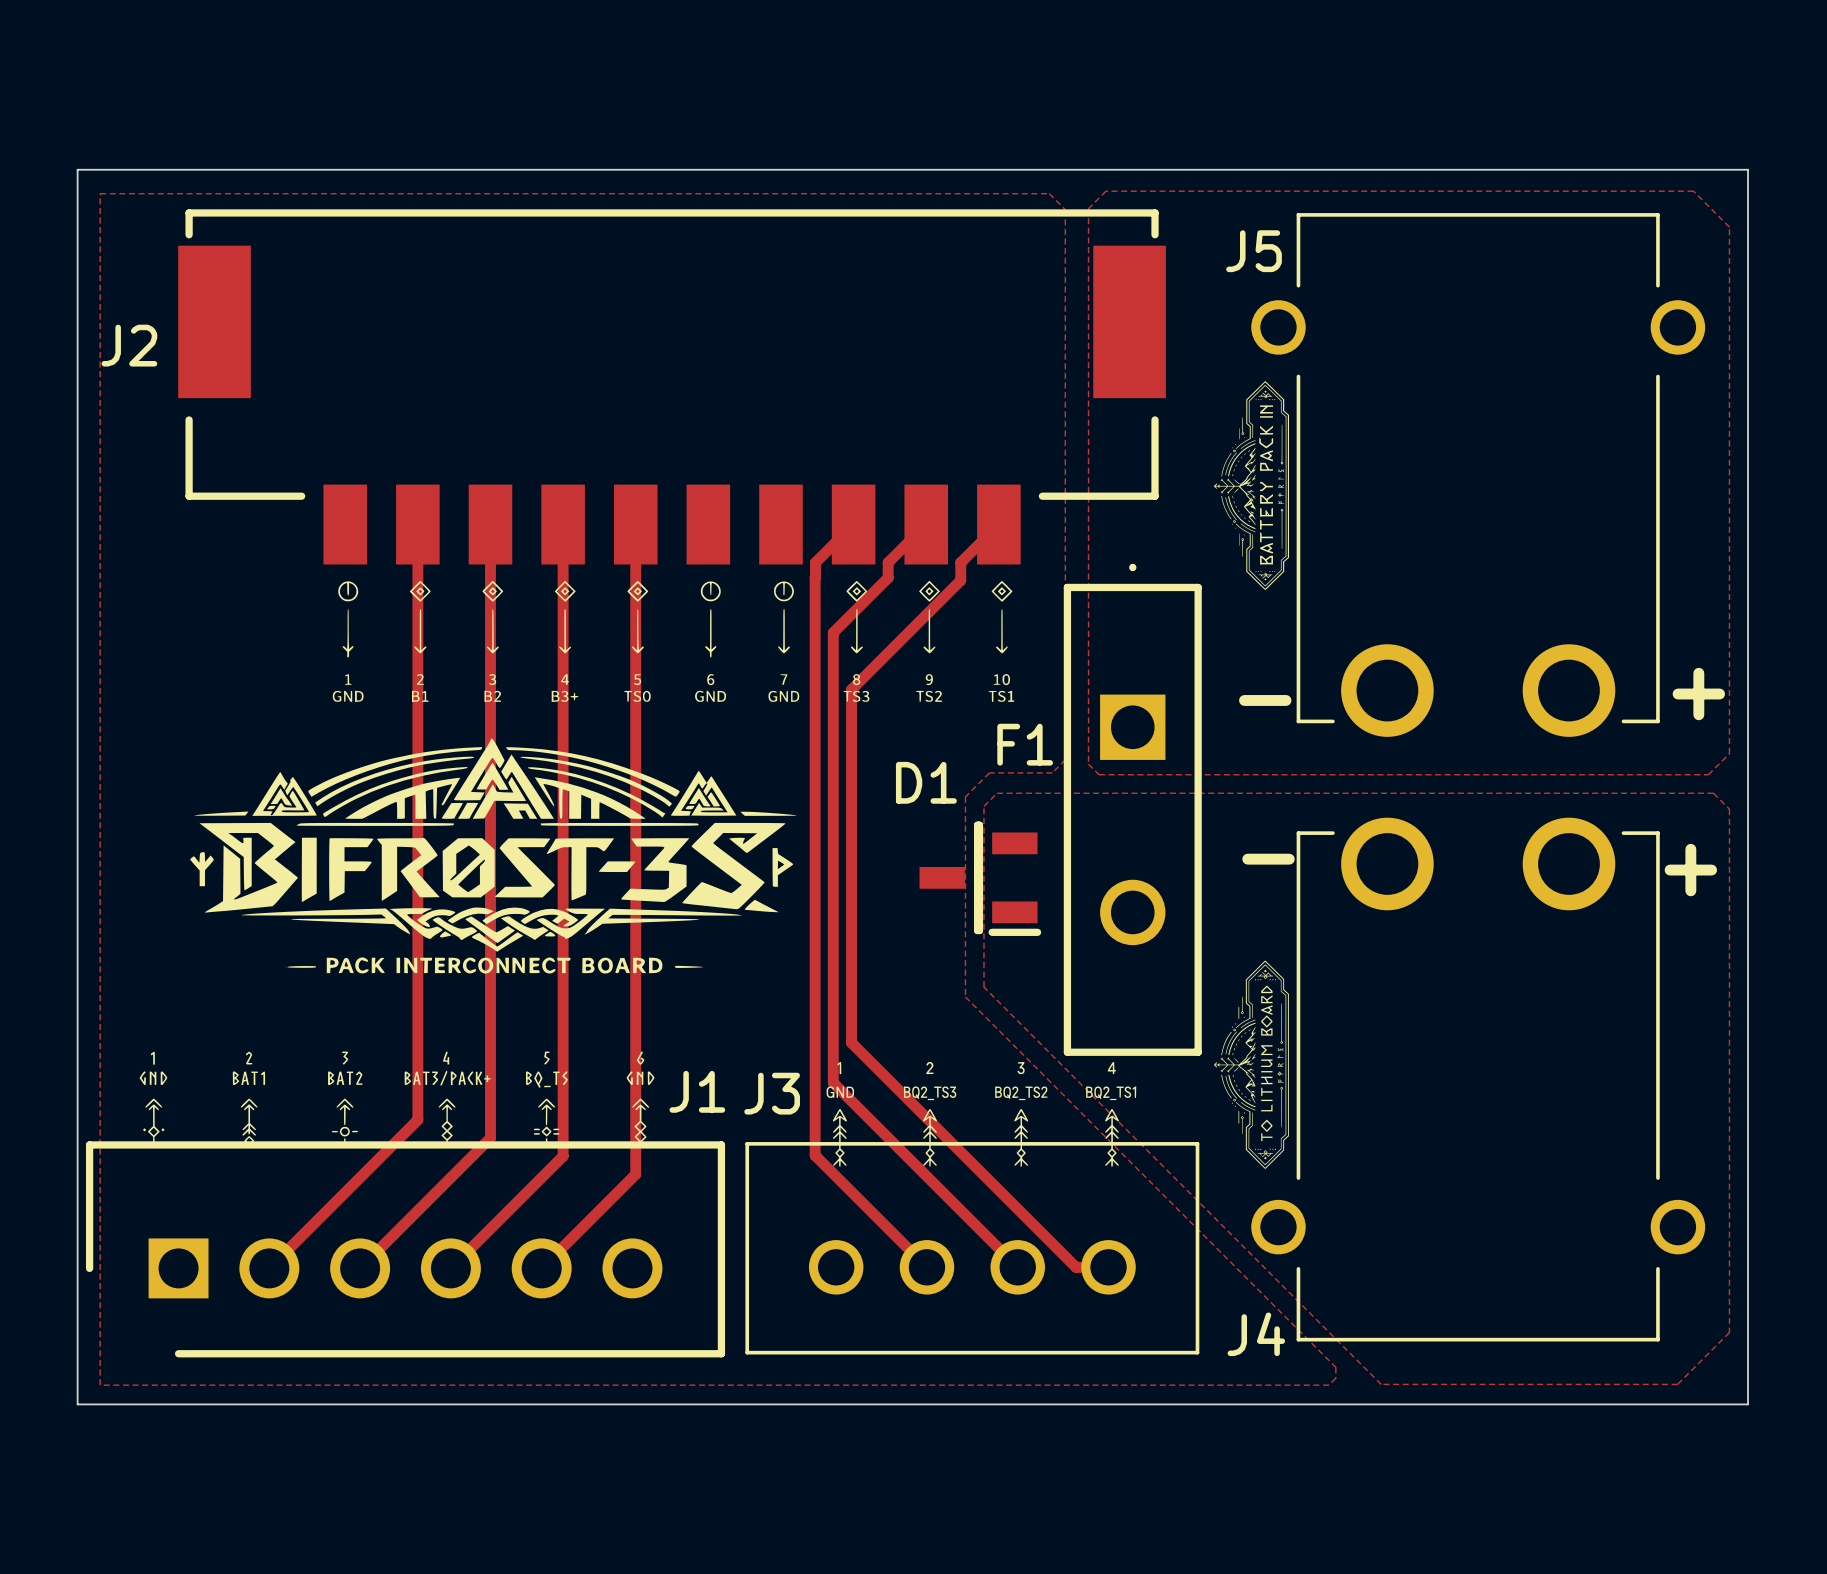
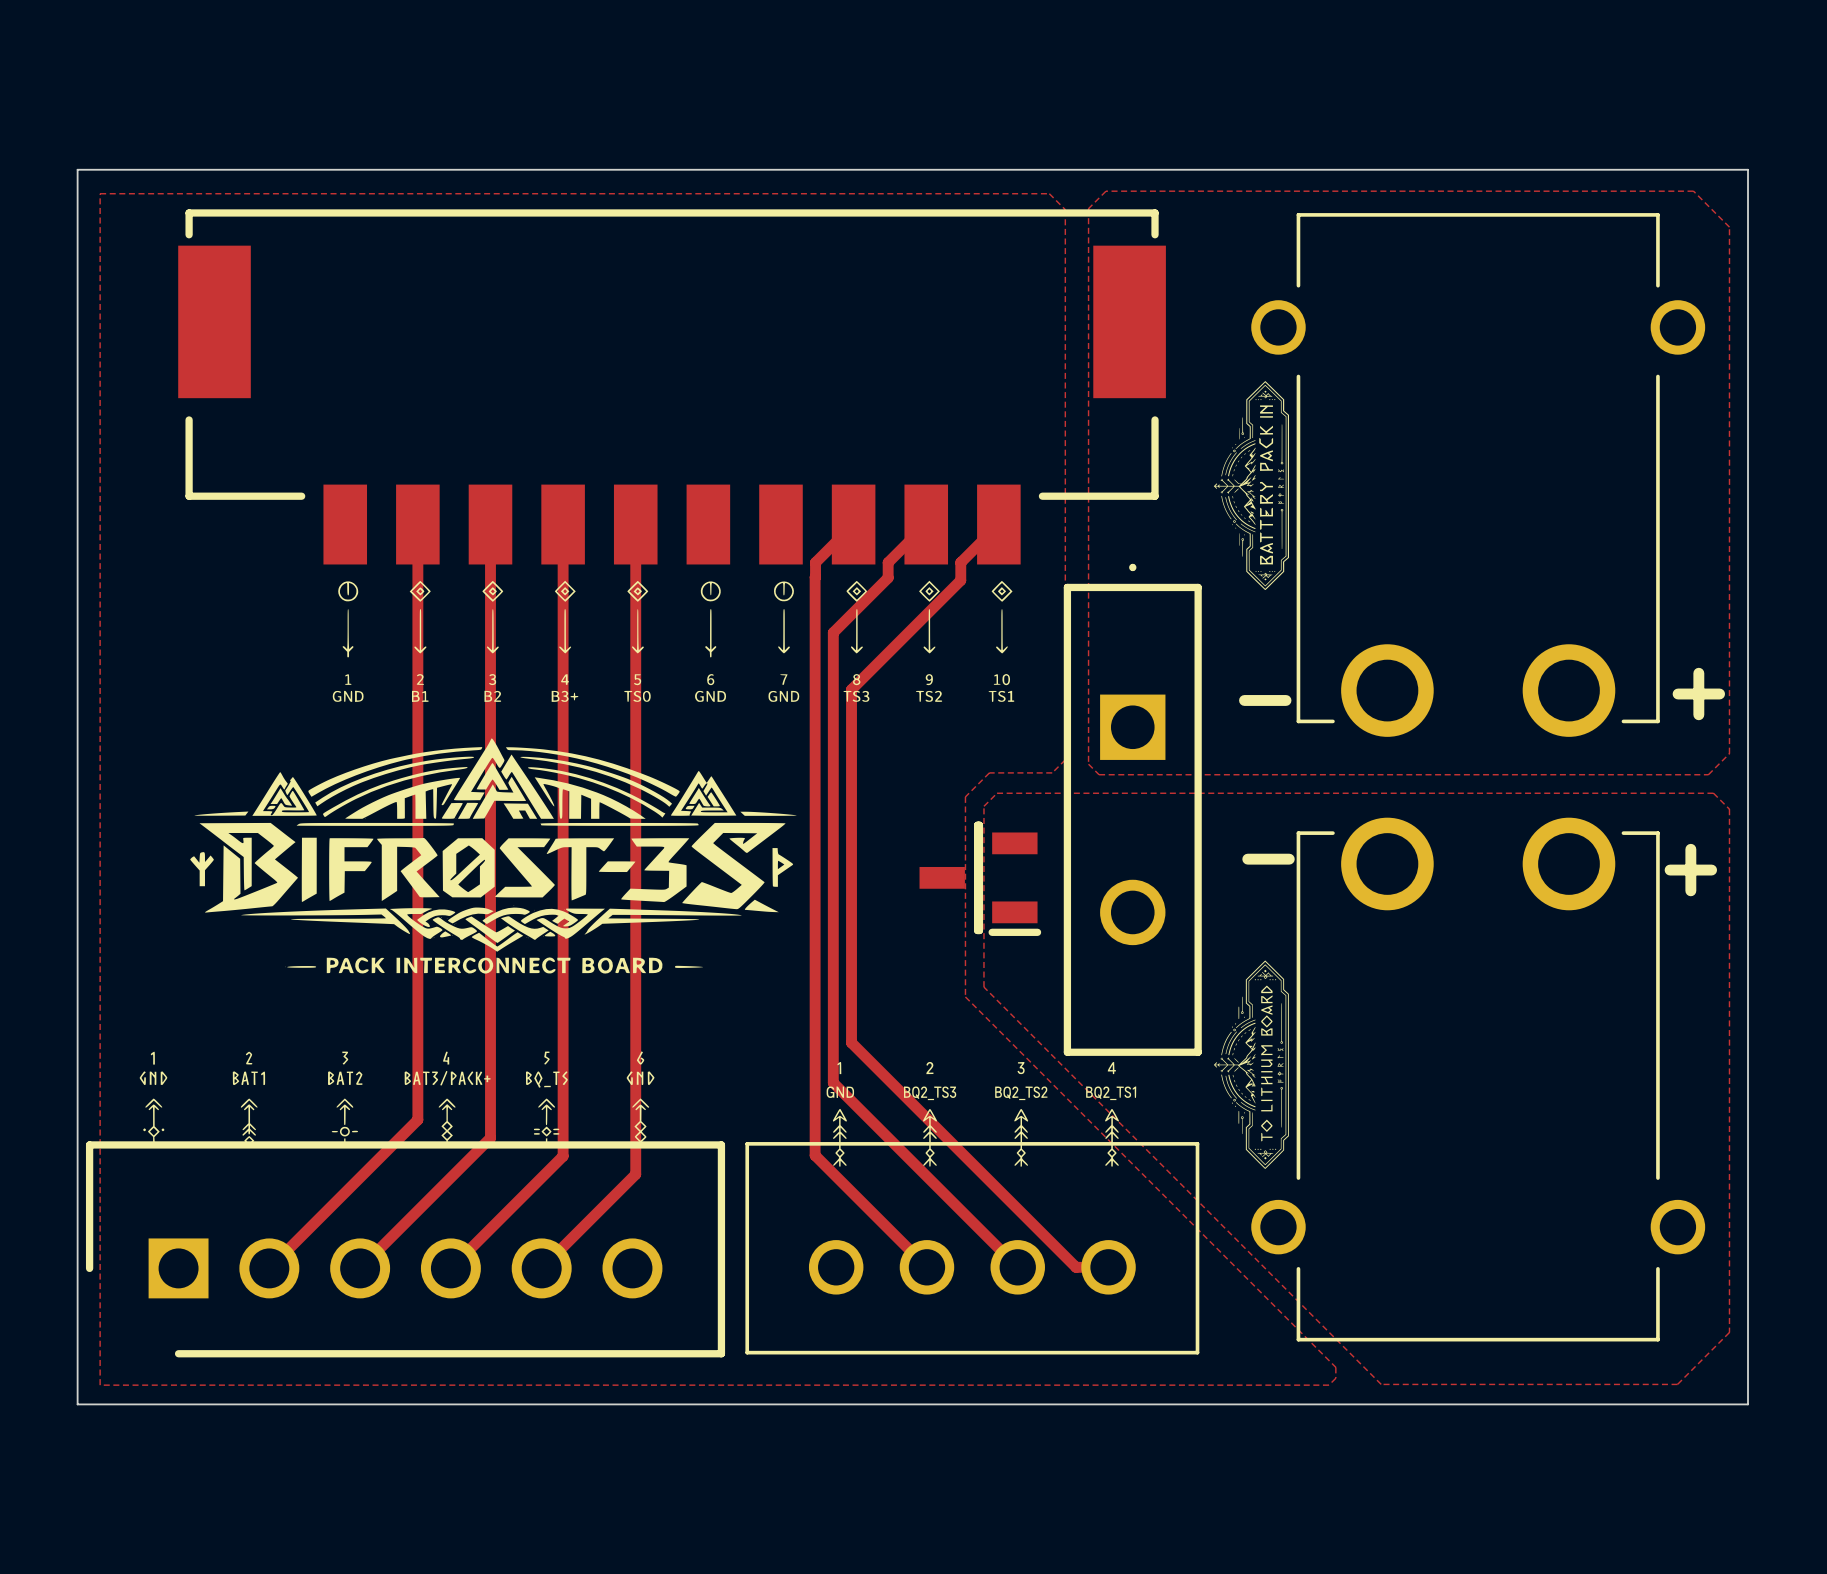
J5 name: J5 (1254, 251) -> none
J2 name: J2 (129, 345) -> none
F1 name: F1 (1025, 744) -> none
D1 name: D1 (926, 782) -> none
J1 name: J1 (697, 1091) -> none
J3 name: J3 (772, 1093) -> none
J4 name: J4 (1256, 1334) -> none

